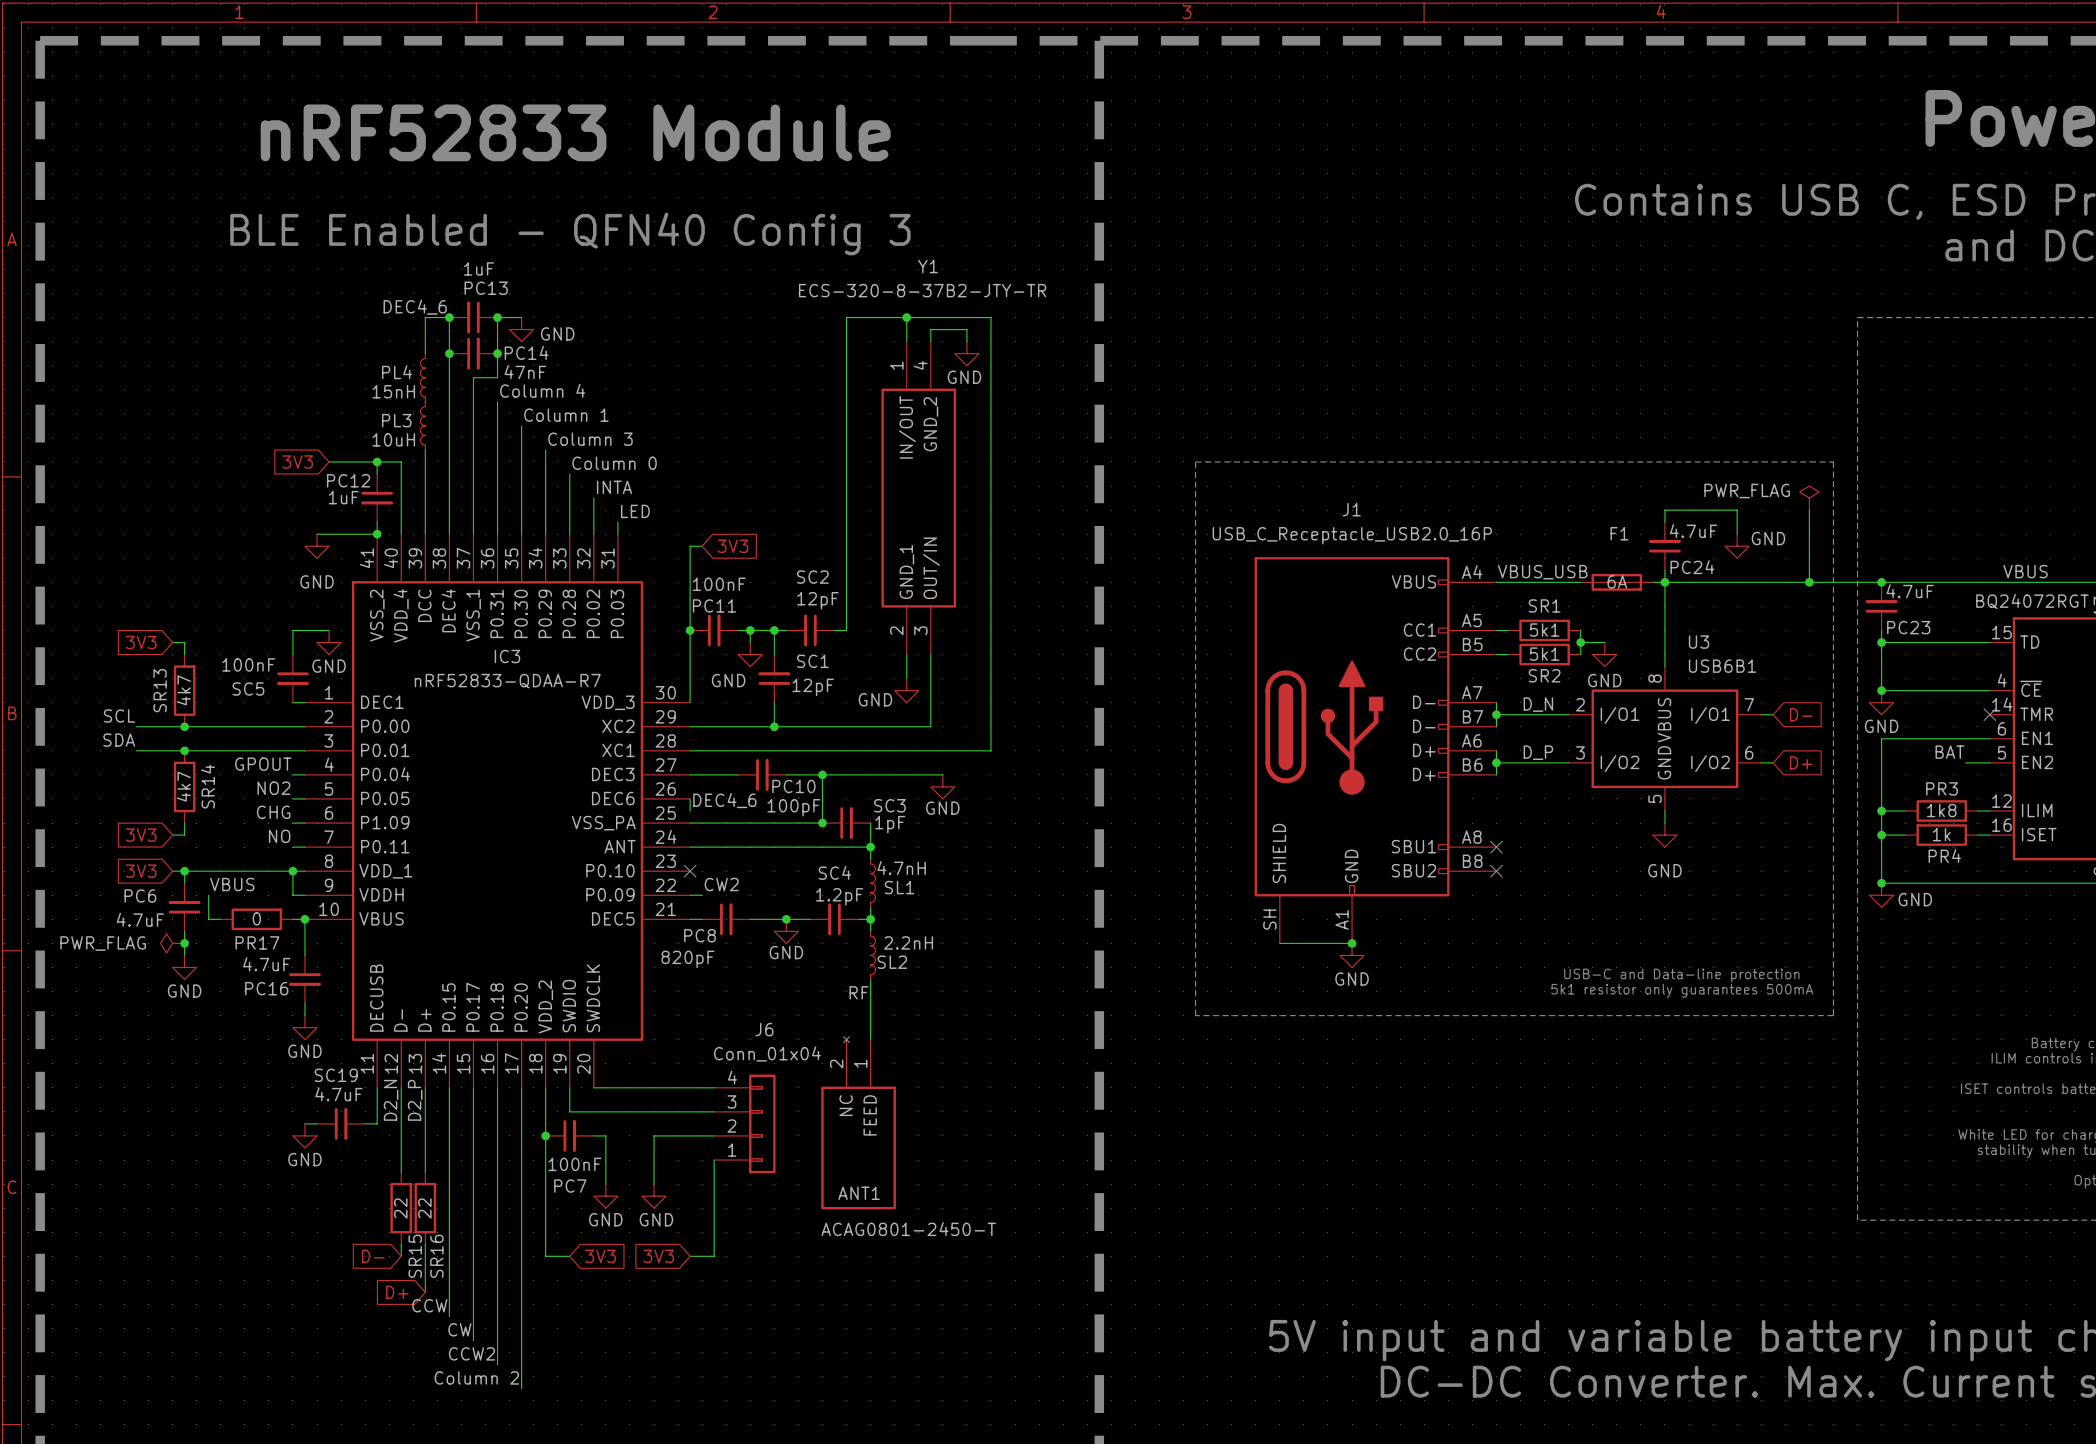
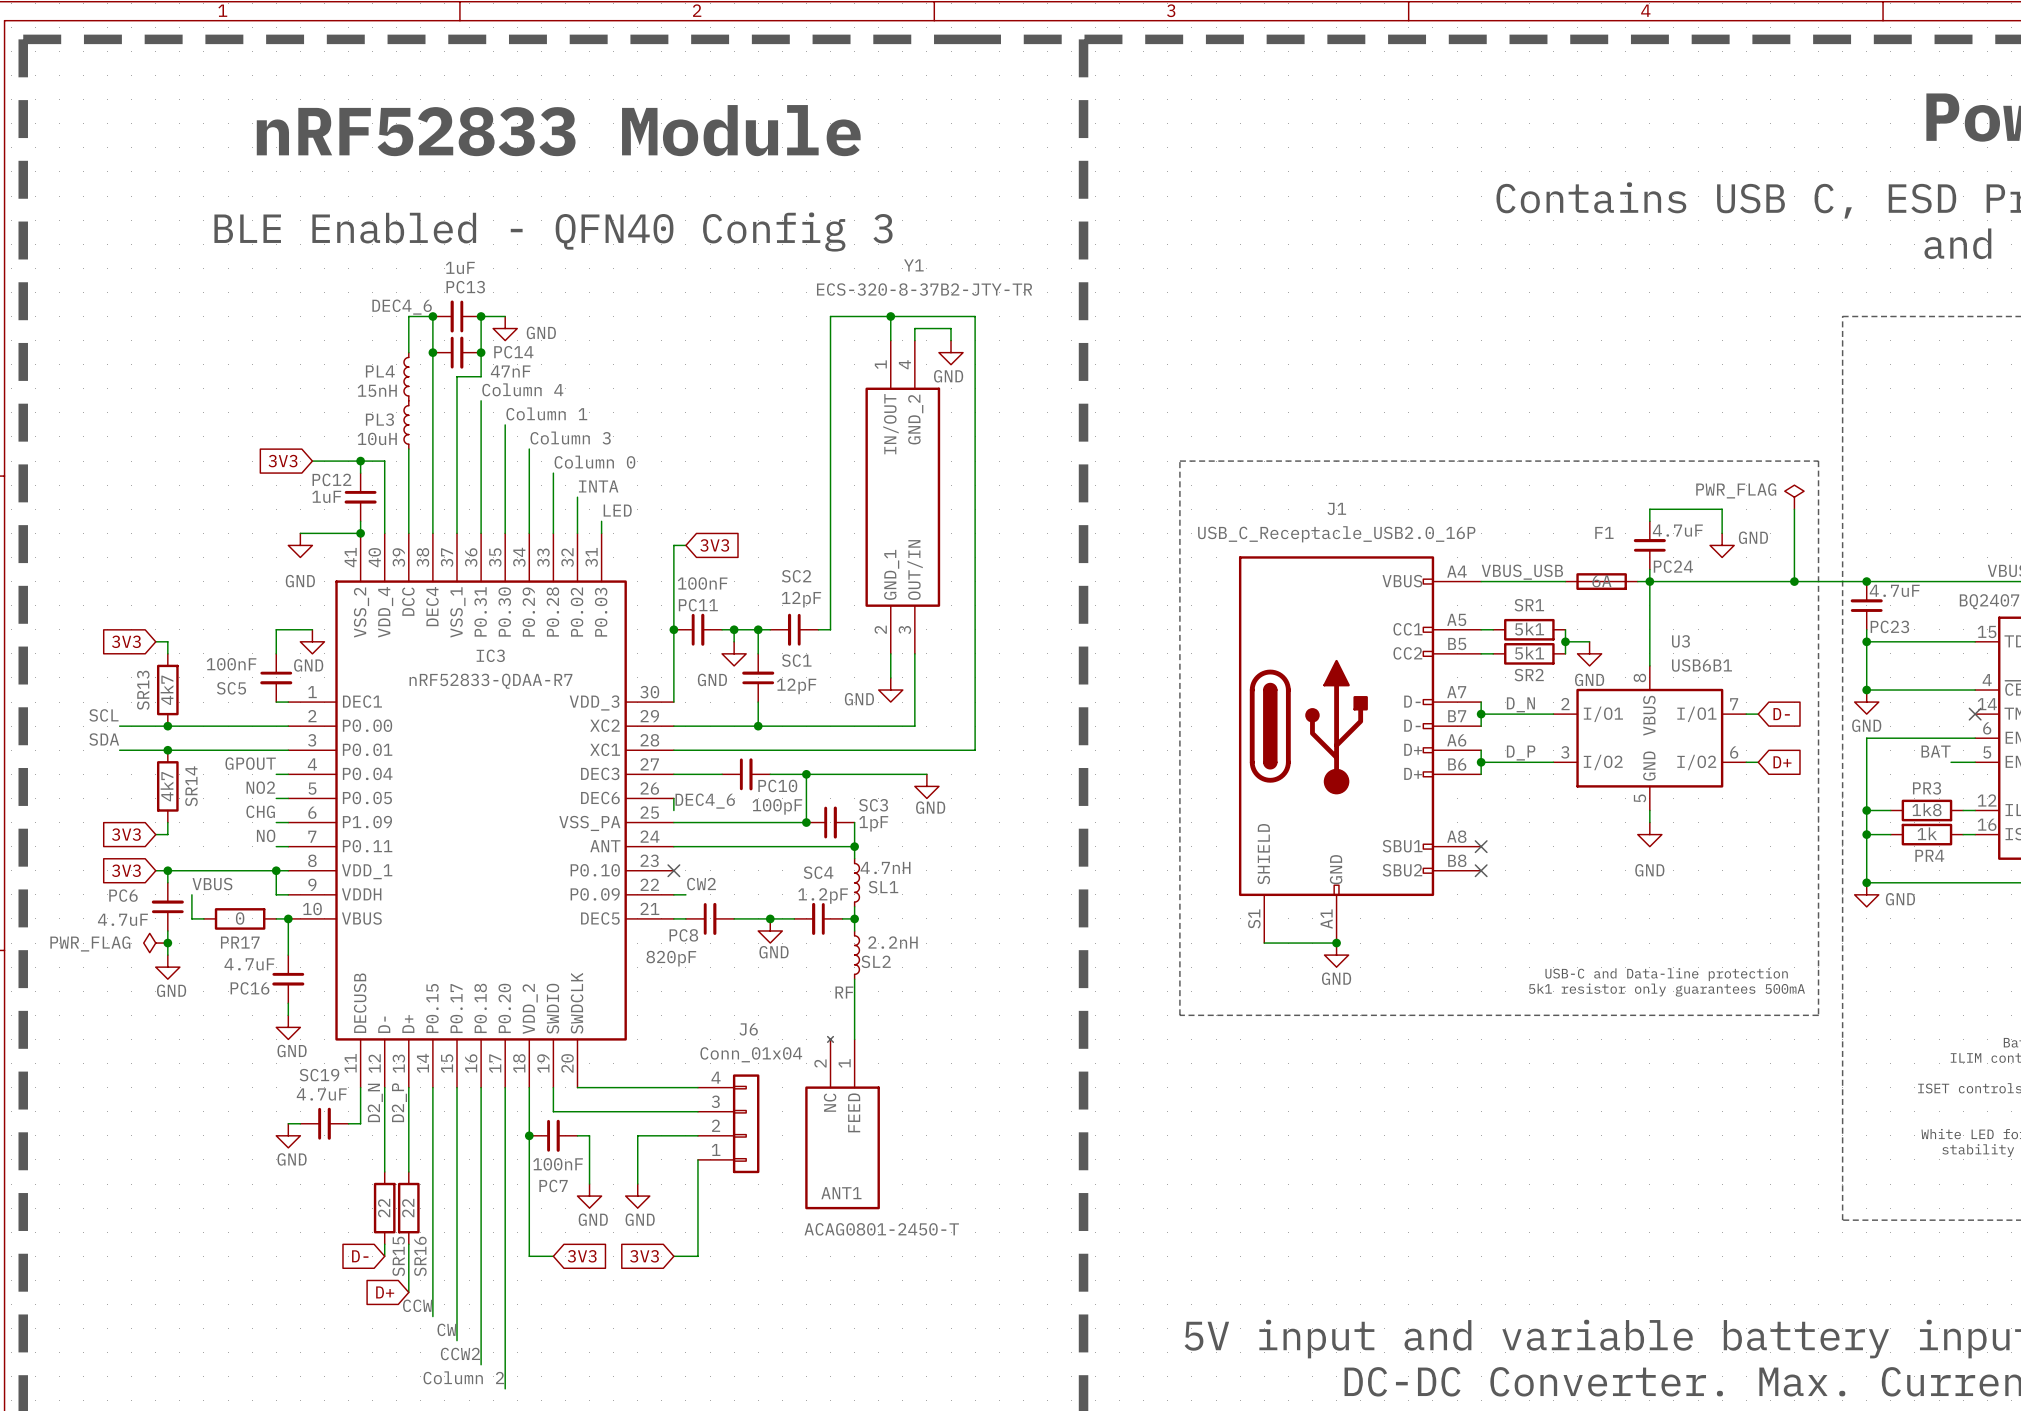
J1 pin number: SH (1269, 919) -> S1 (1254, 918)

